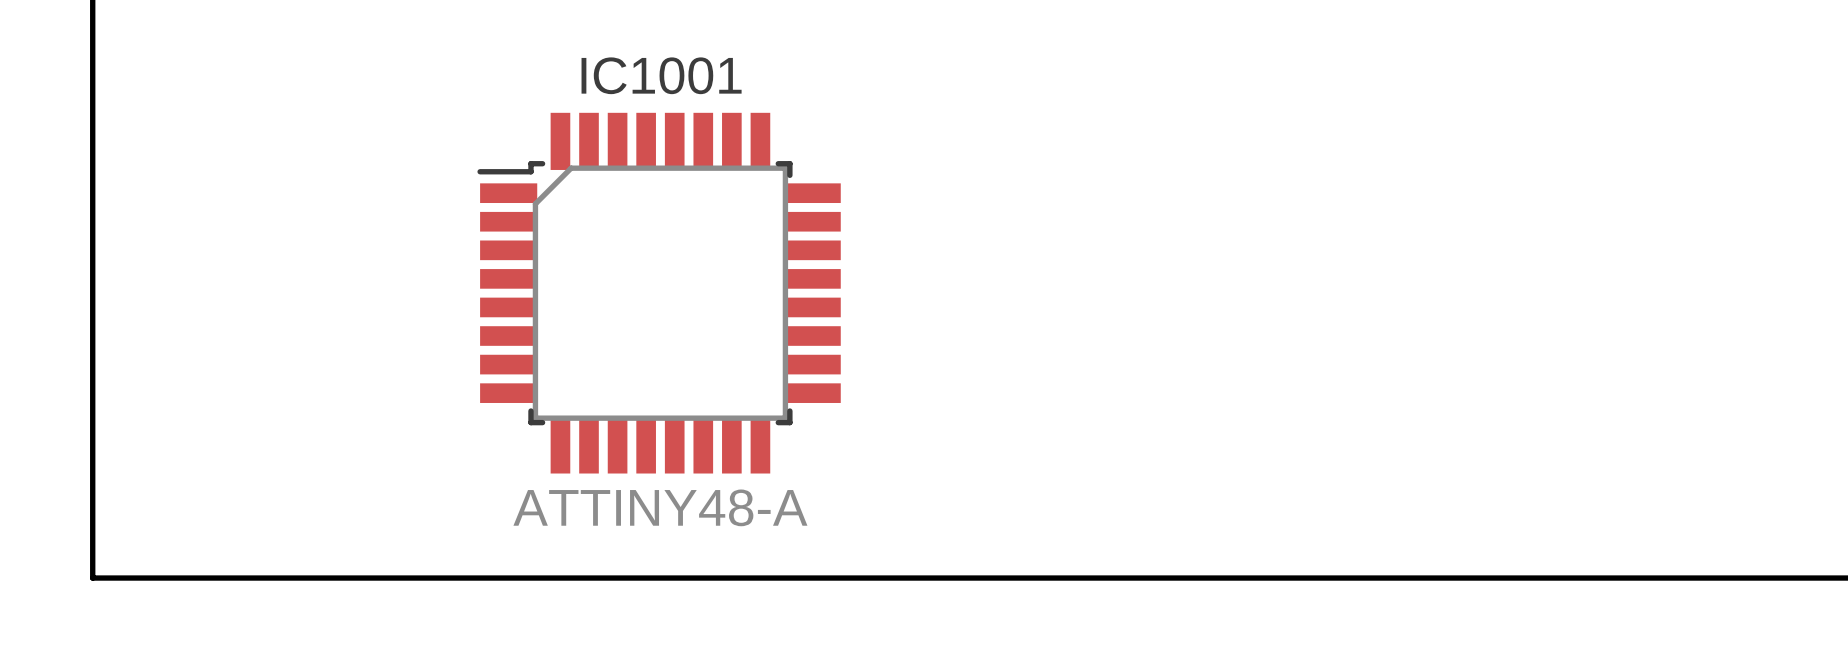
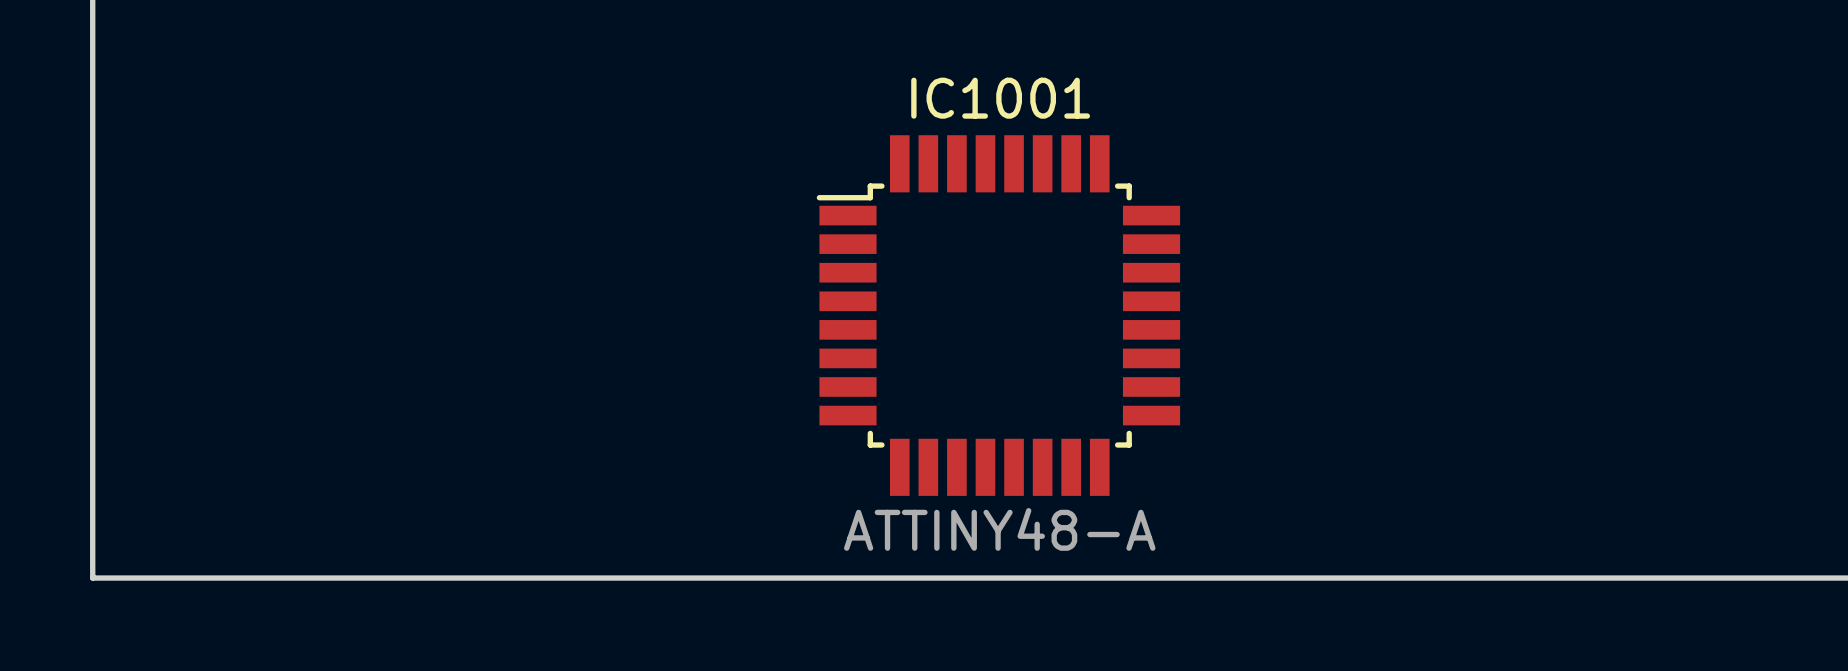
IC1001 footprint: [477, 112, 841, 474] -> [816, 135, 1181, 496]

